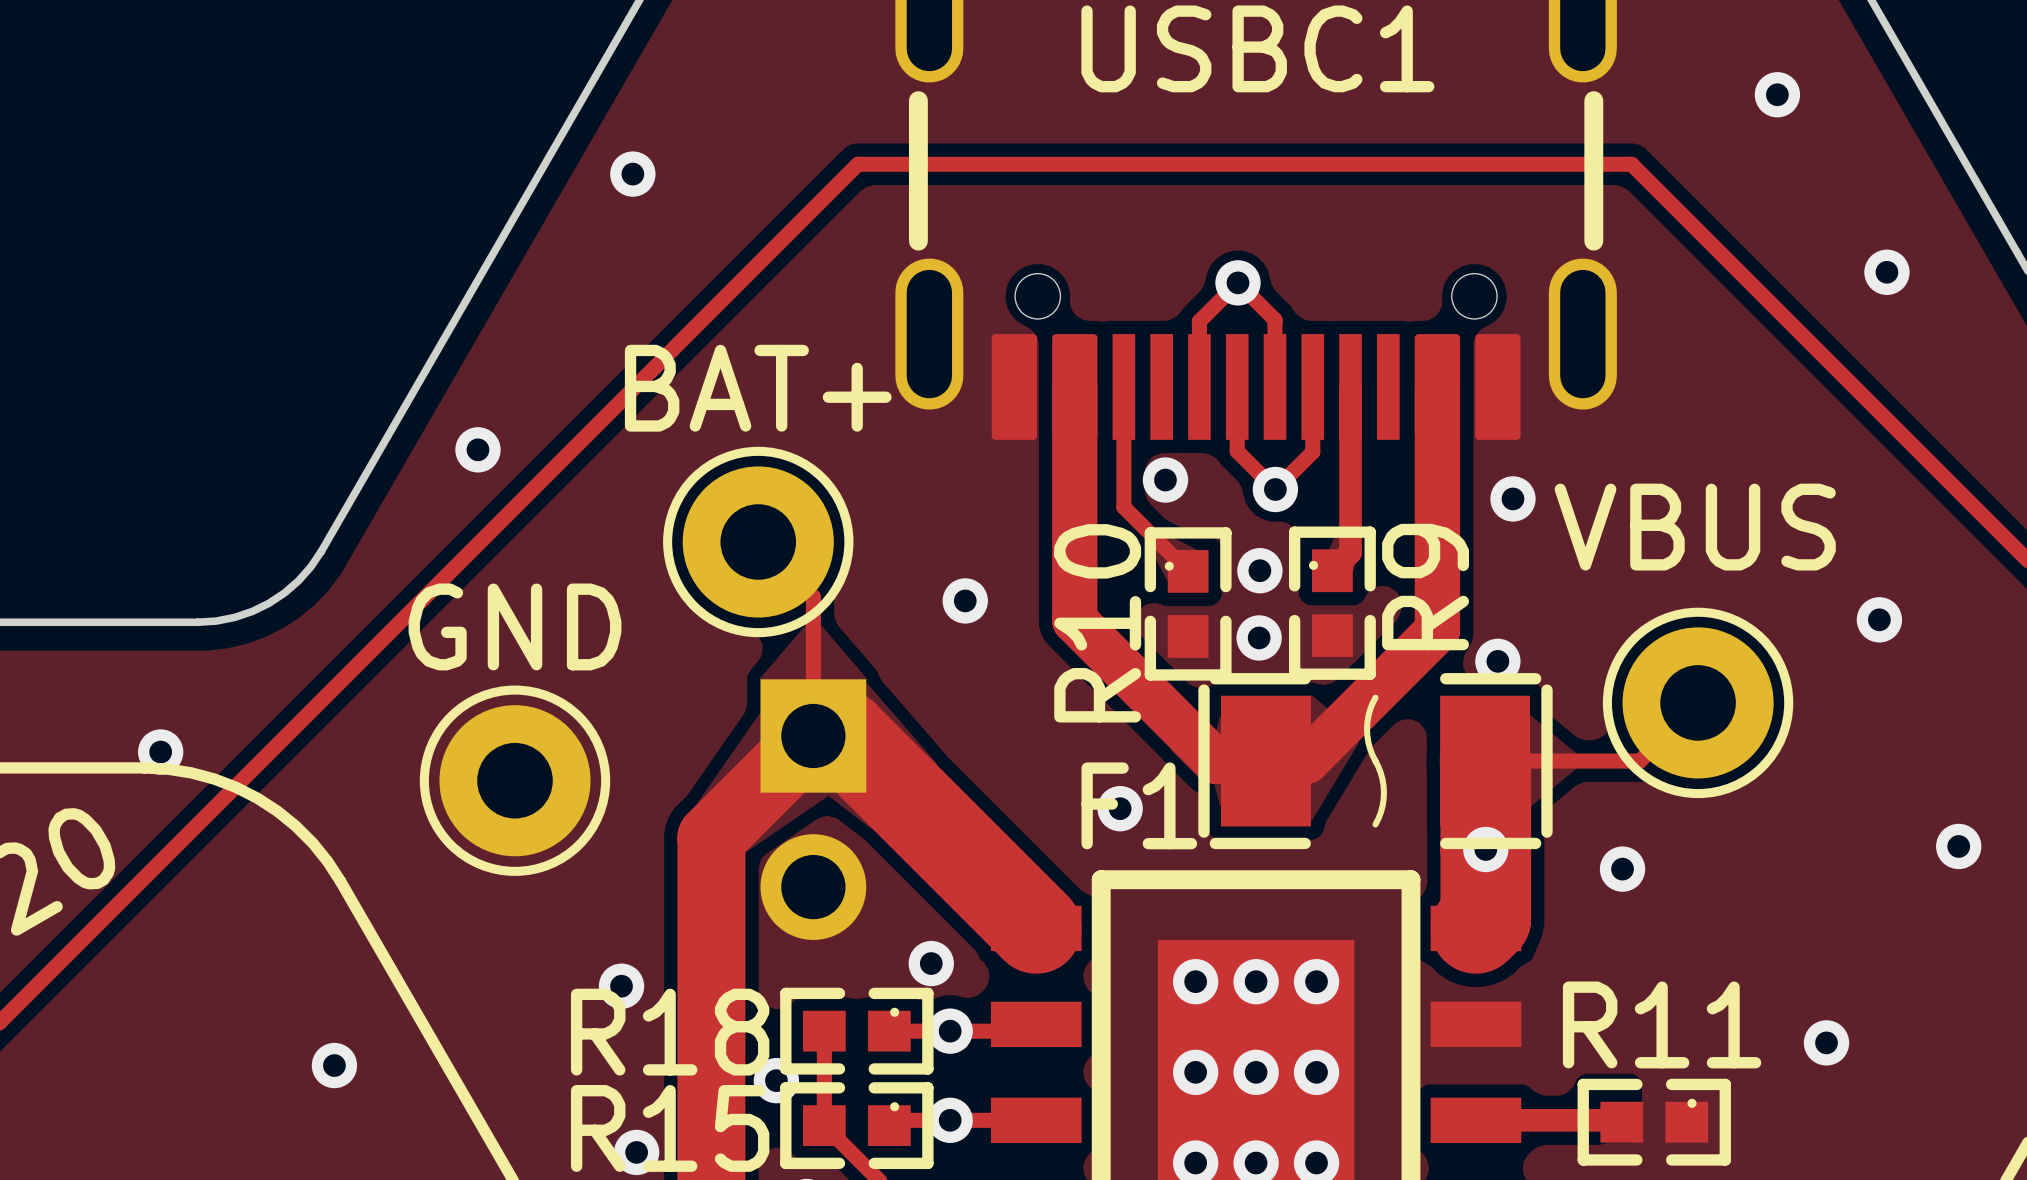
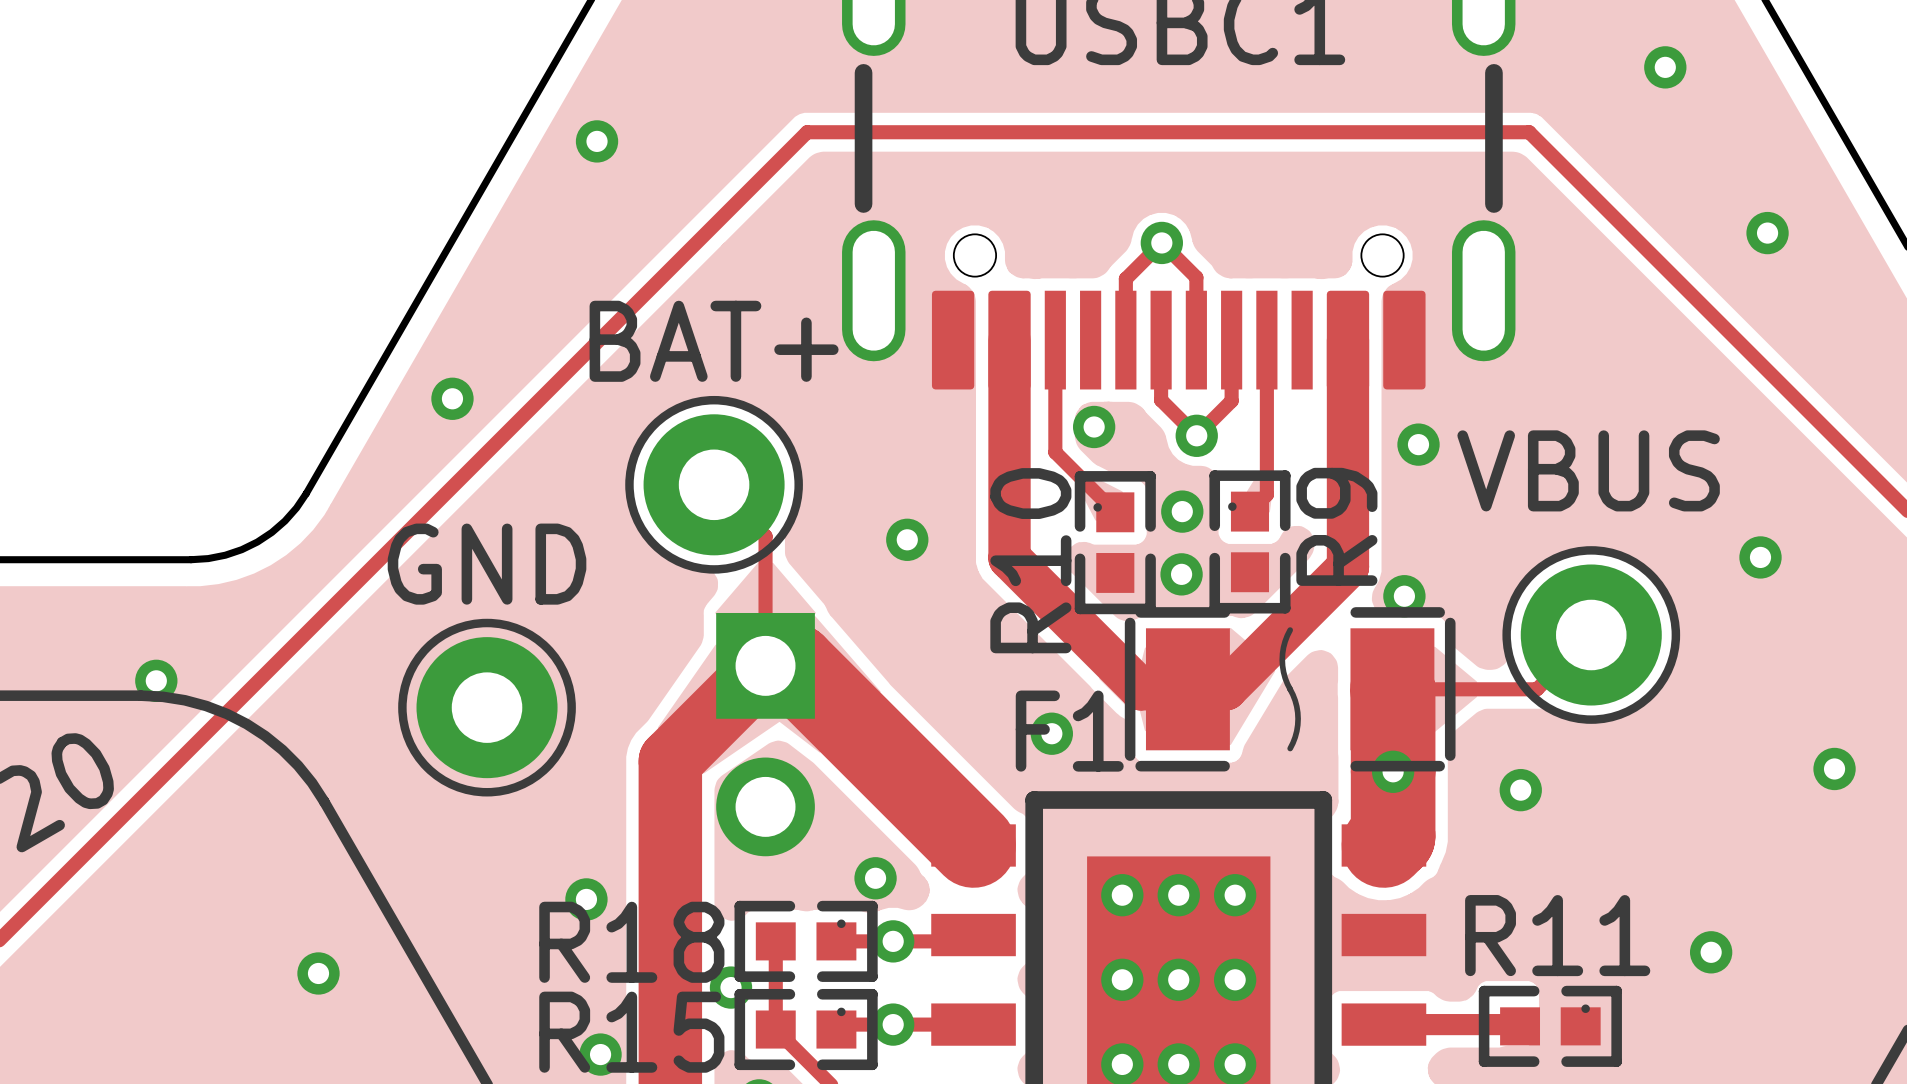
track width: thick (1350, 386) (1350, 552) (1332, 570) -> thin (1266, 340) (1266, 494) (1249, 511)

